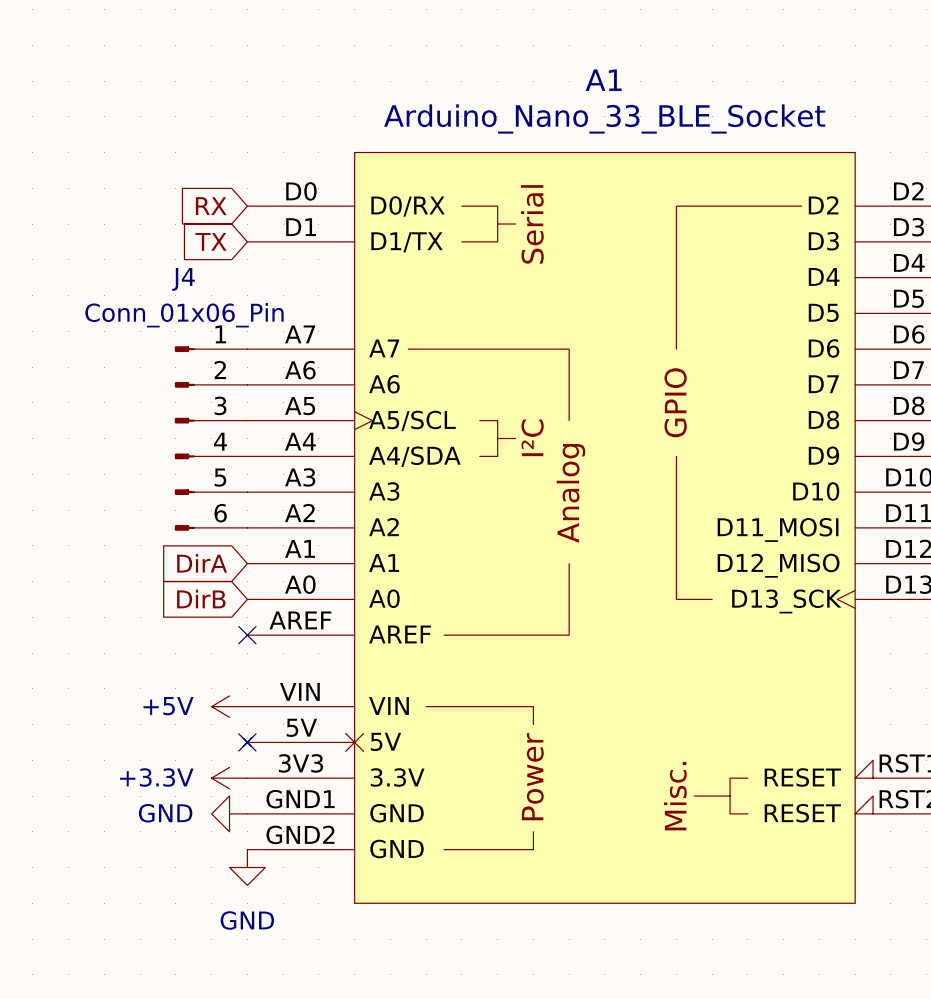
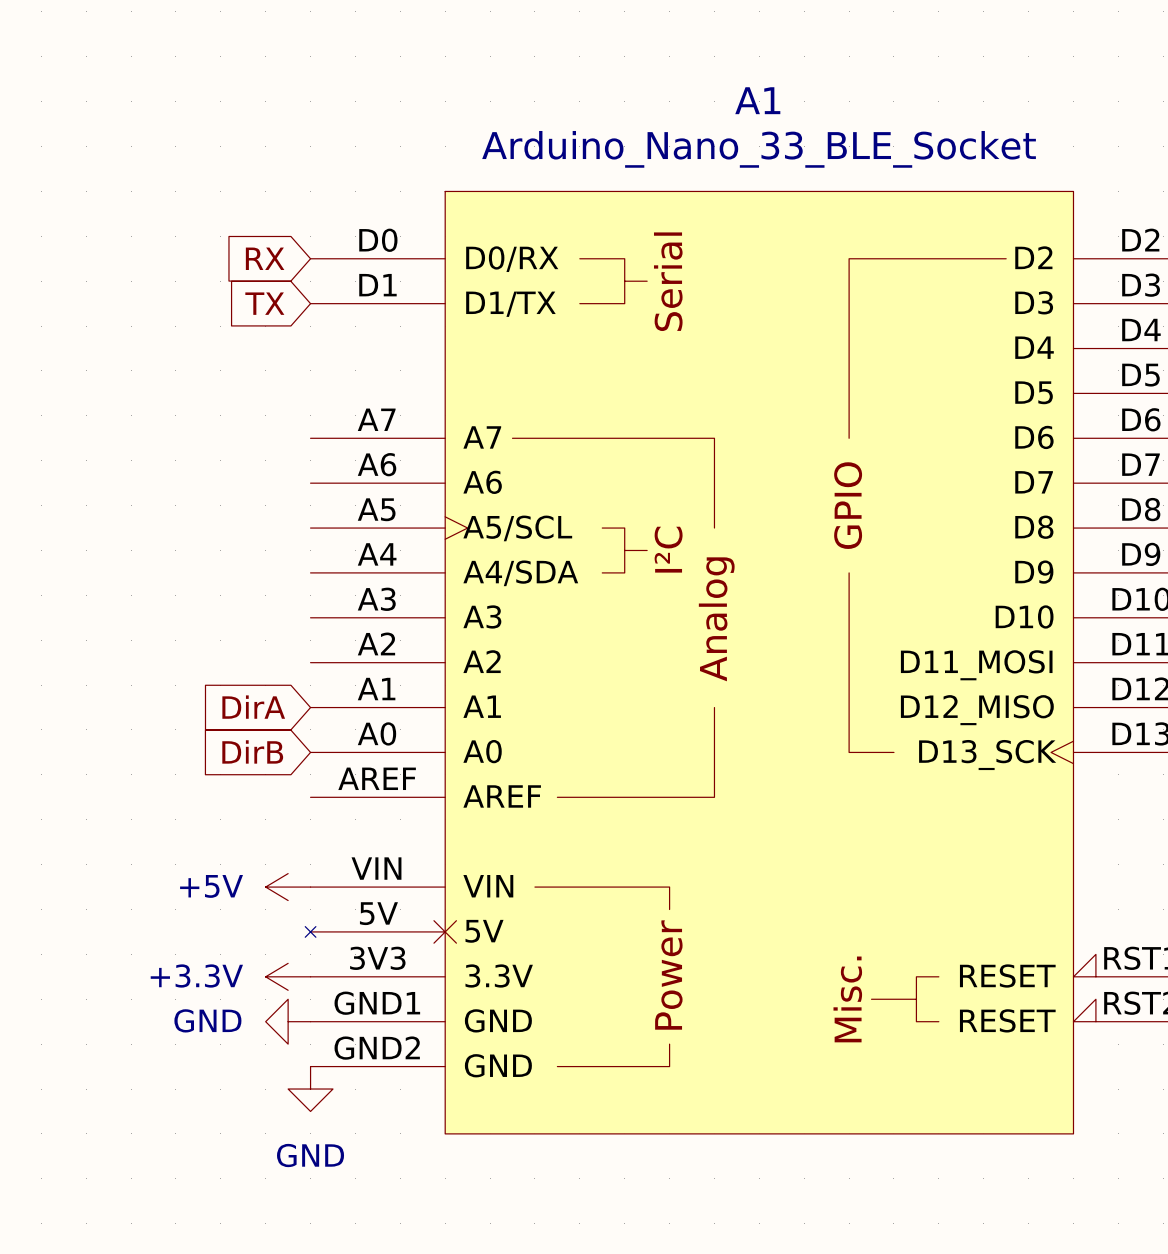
J4: Conn_01x06_Pin (211, 438) -> none
no-connect mark: (247, 635) -> none
no-connect mark: (247, 742) -> none

